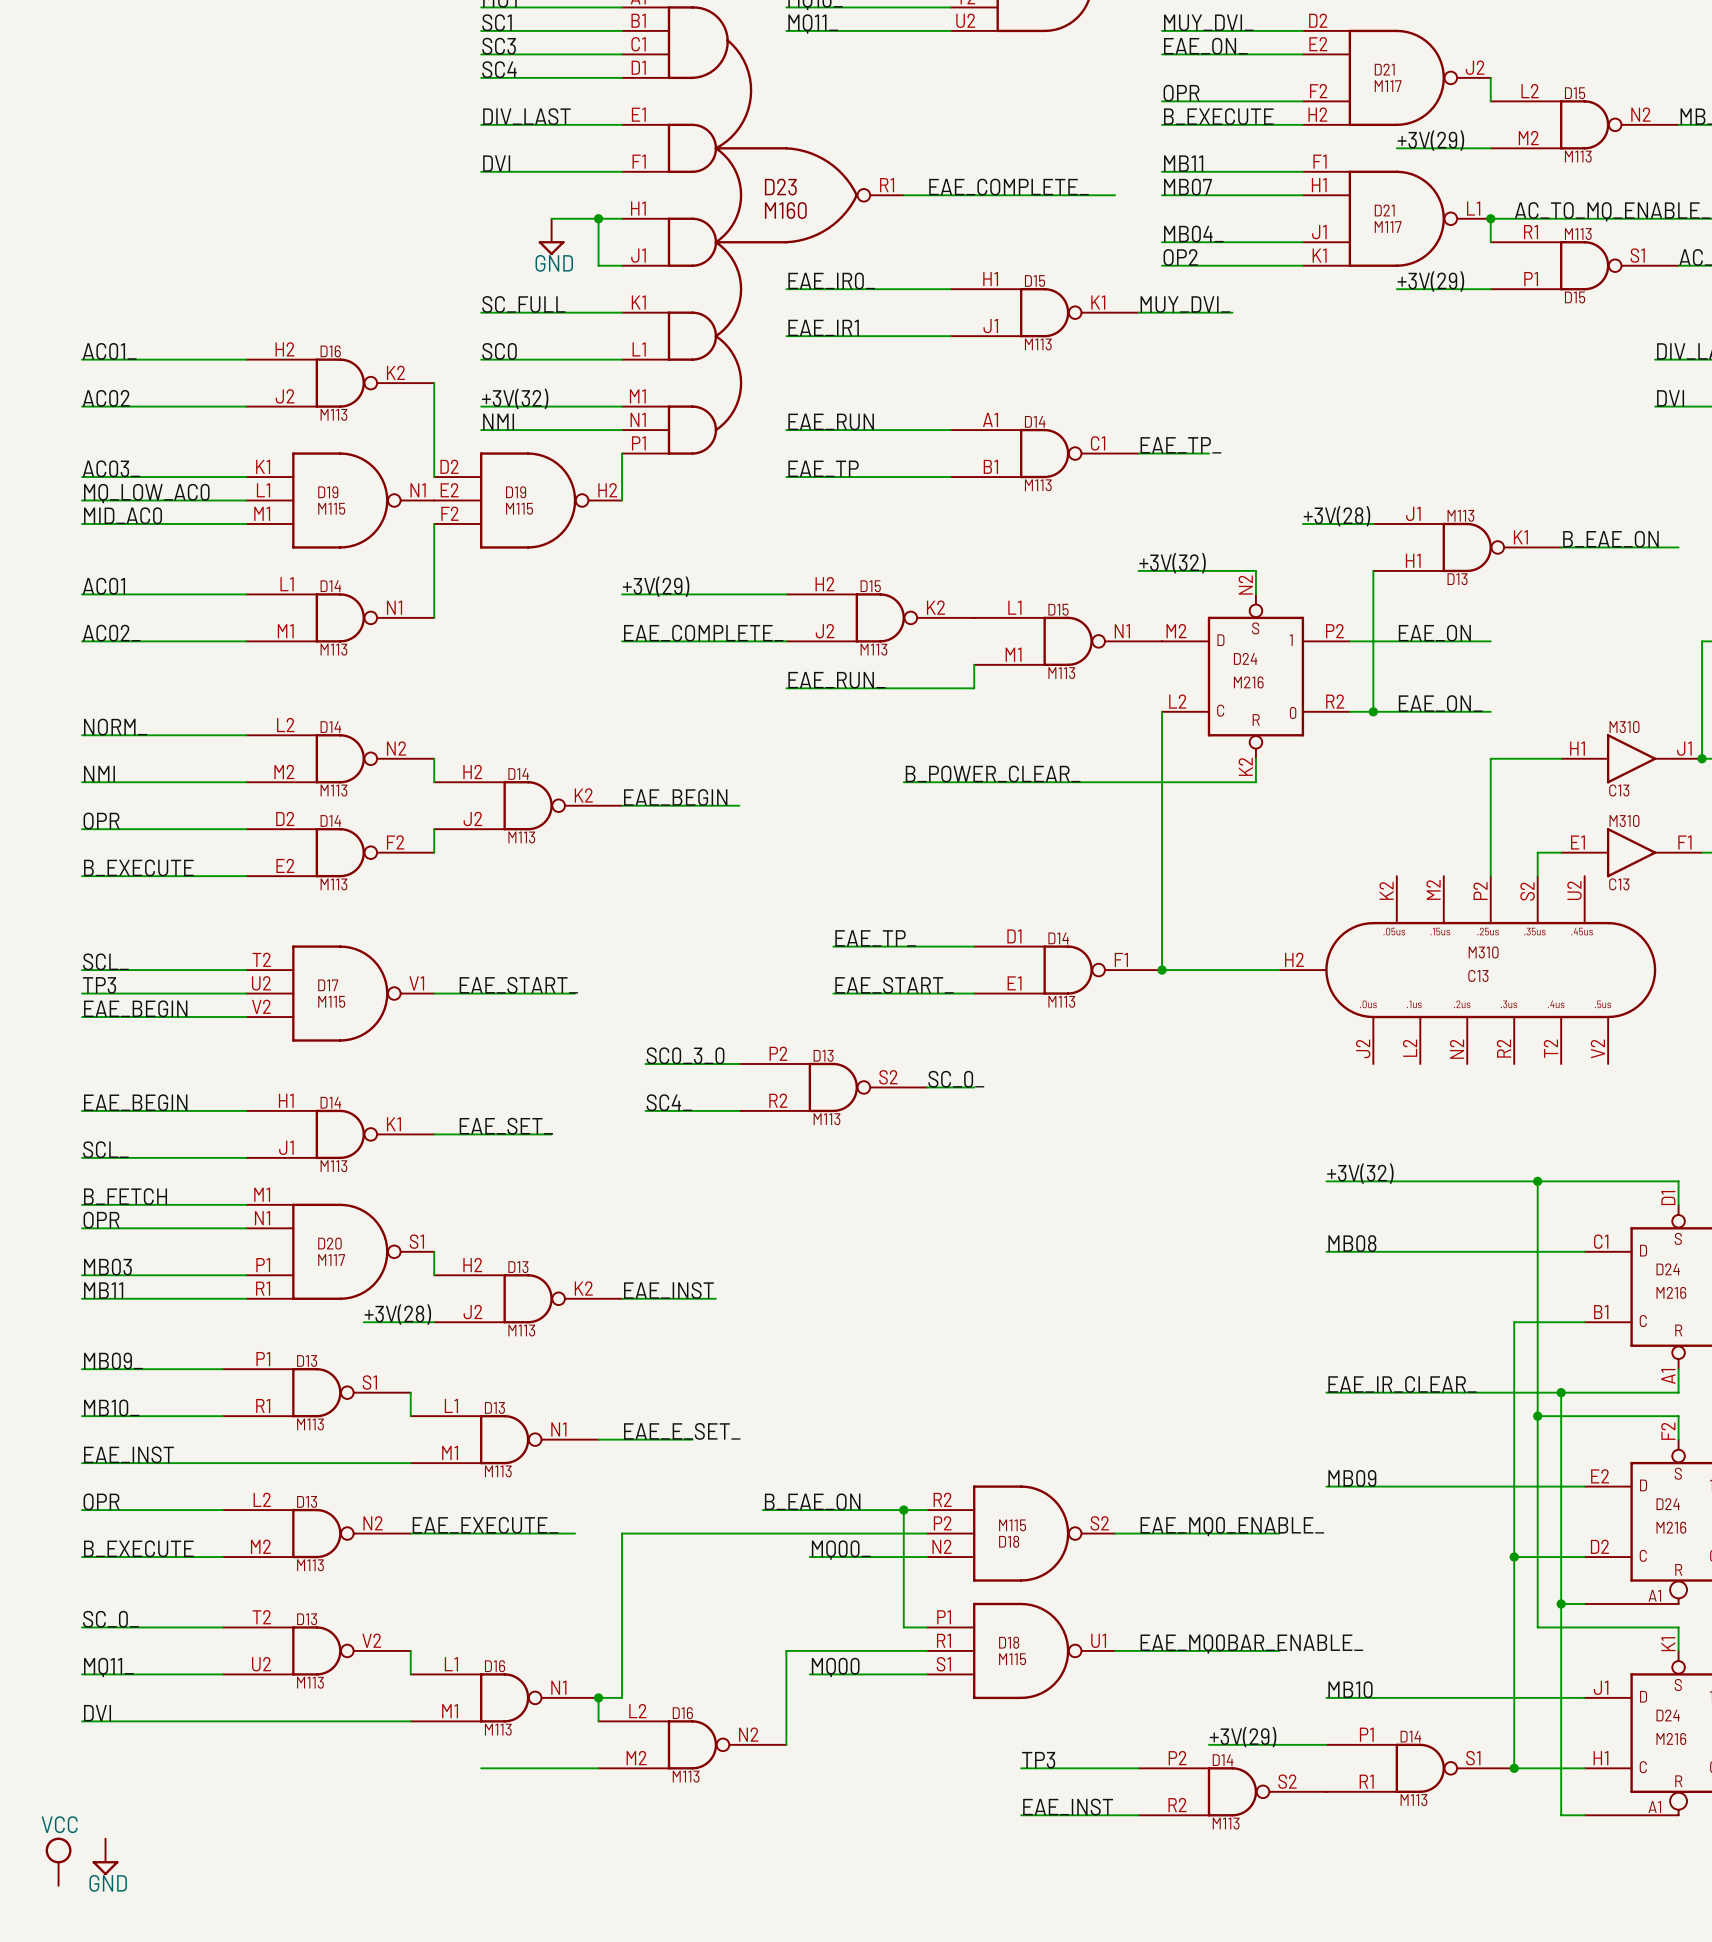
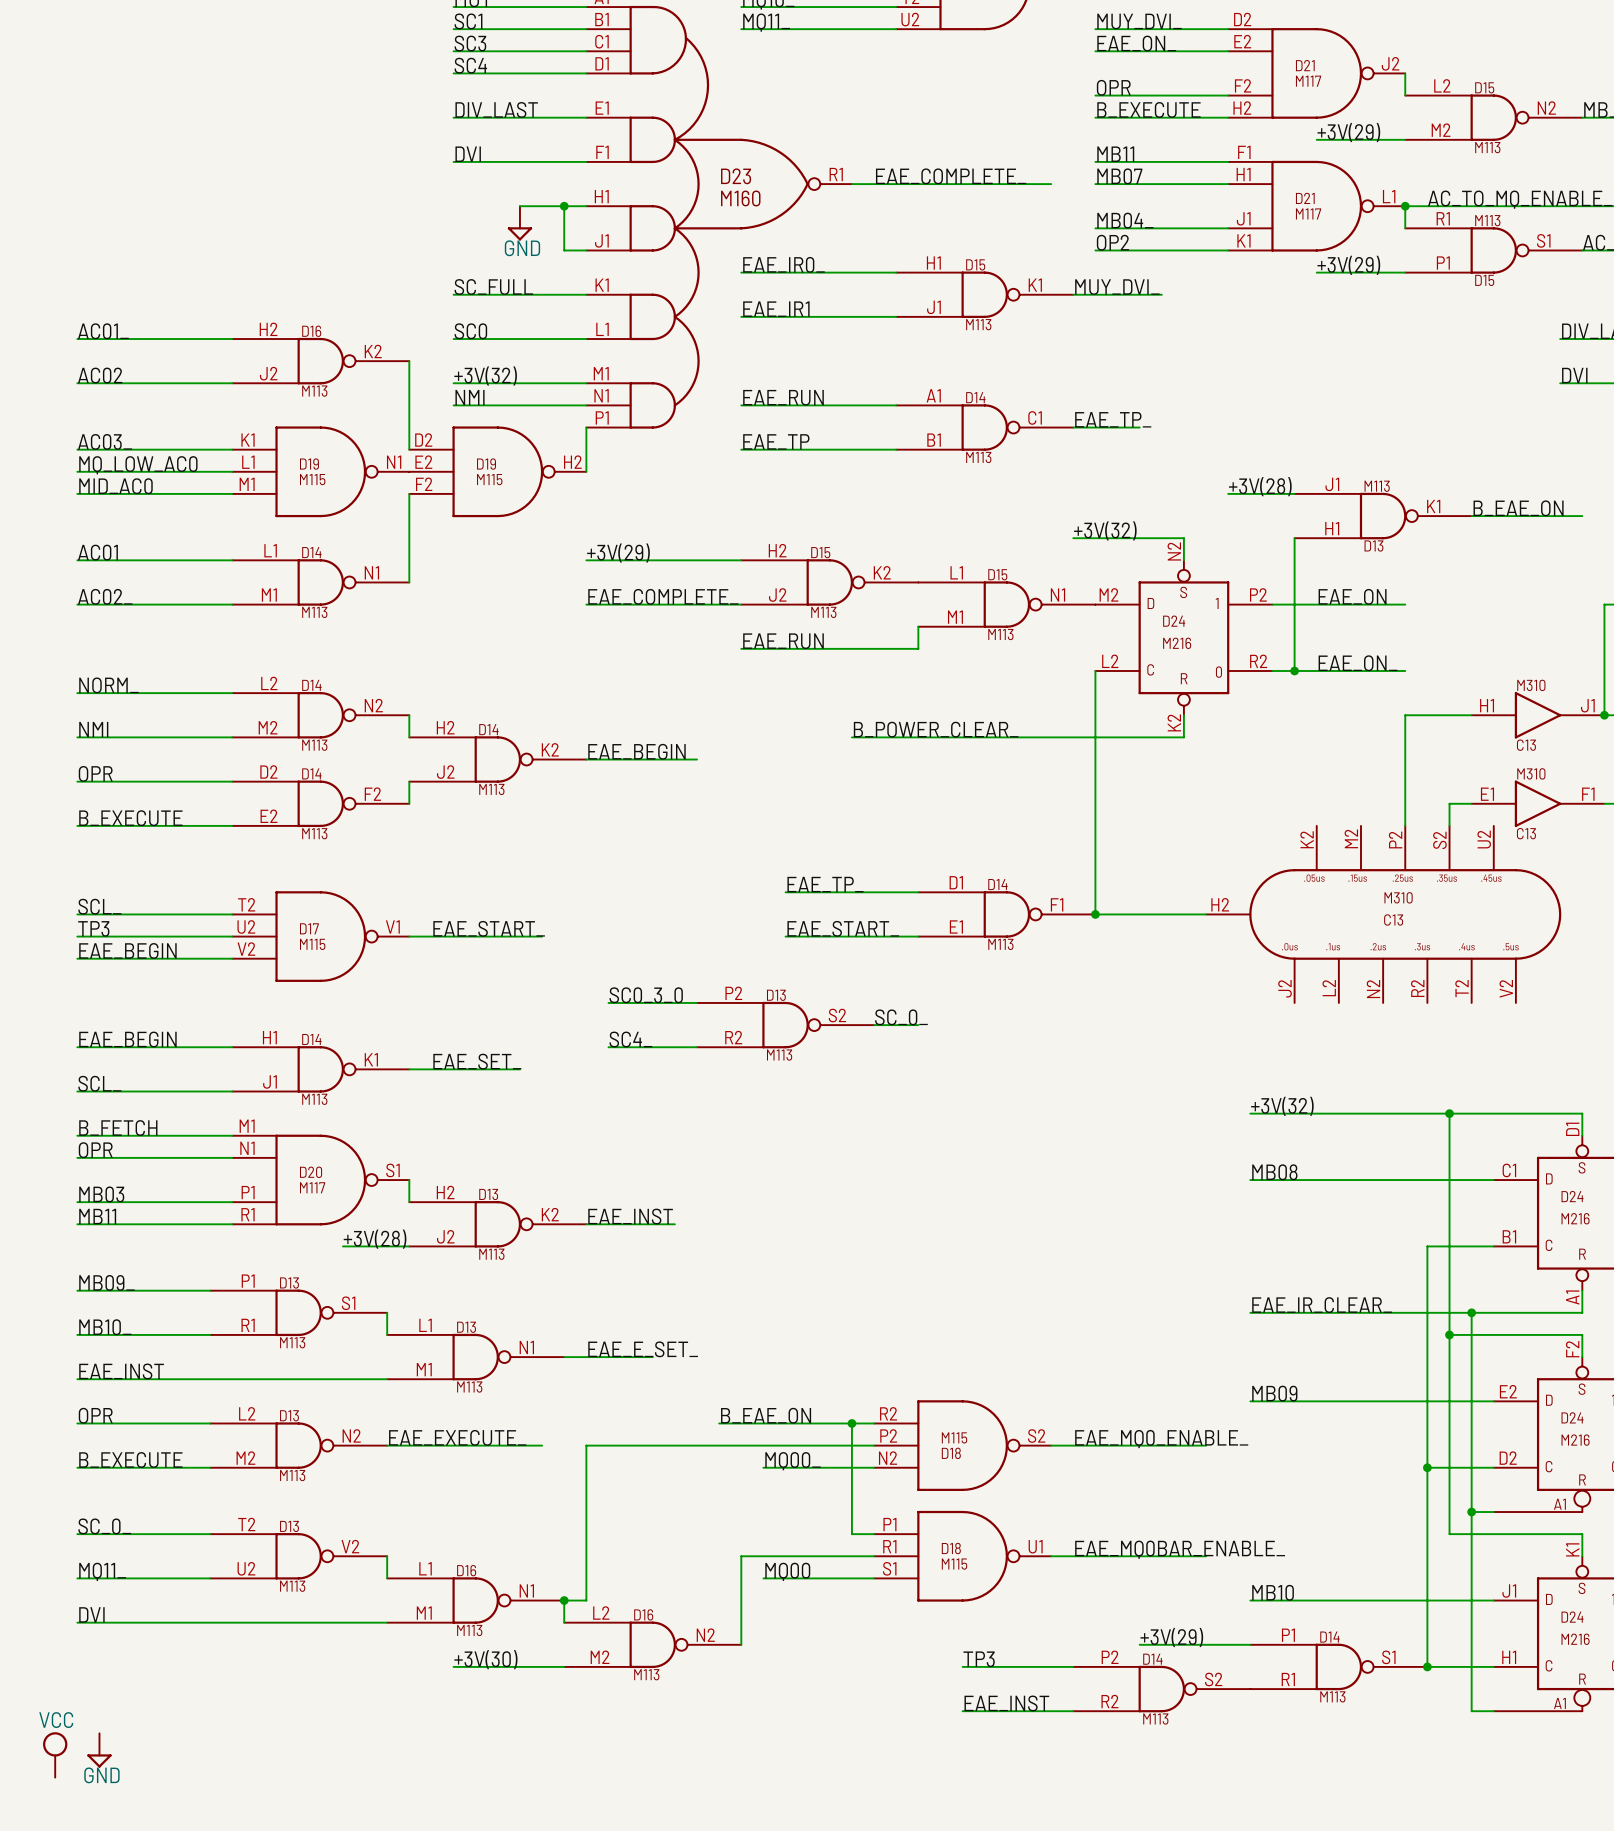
label: EAE_RUN_ (836, 680) -> EAE_RUN (783, 641)
label: none -> +3V(30) (485, 1659)

